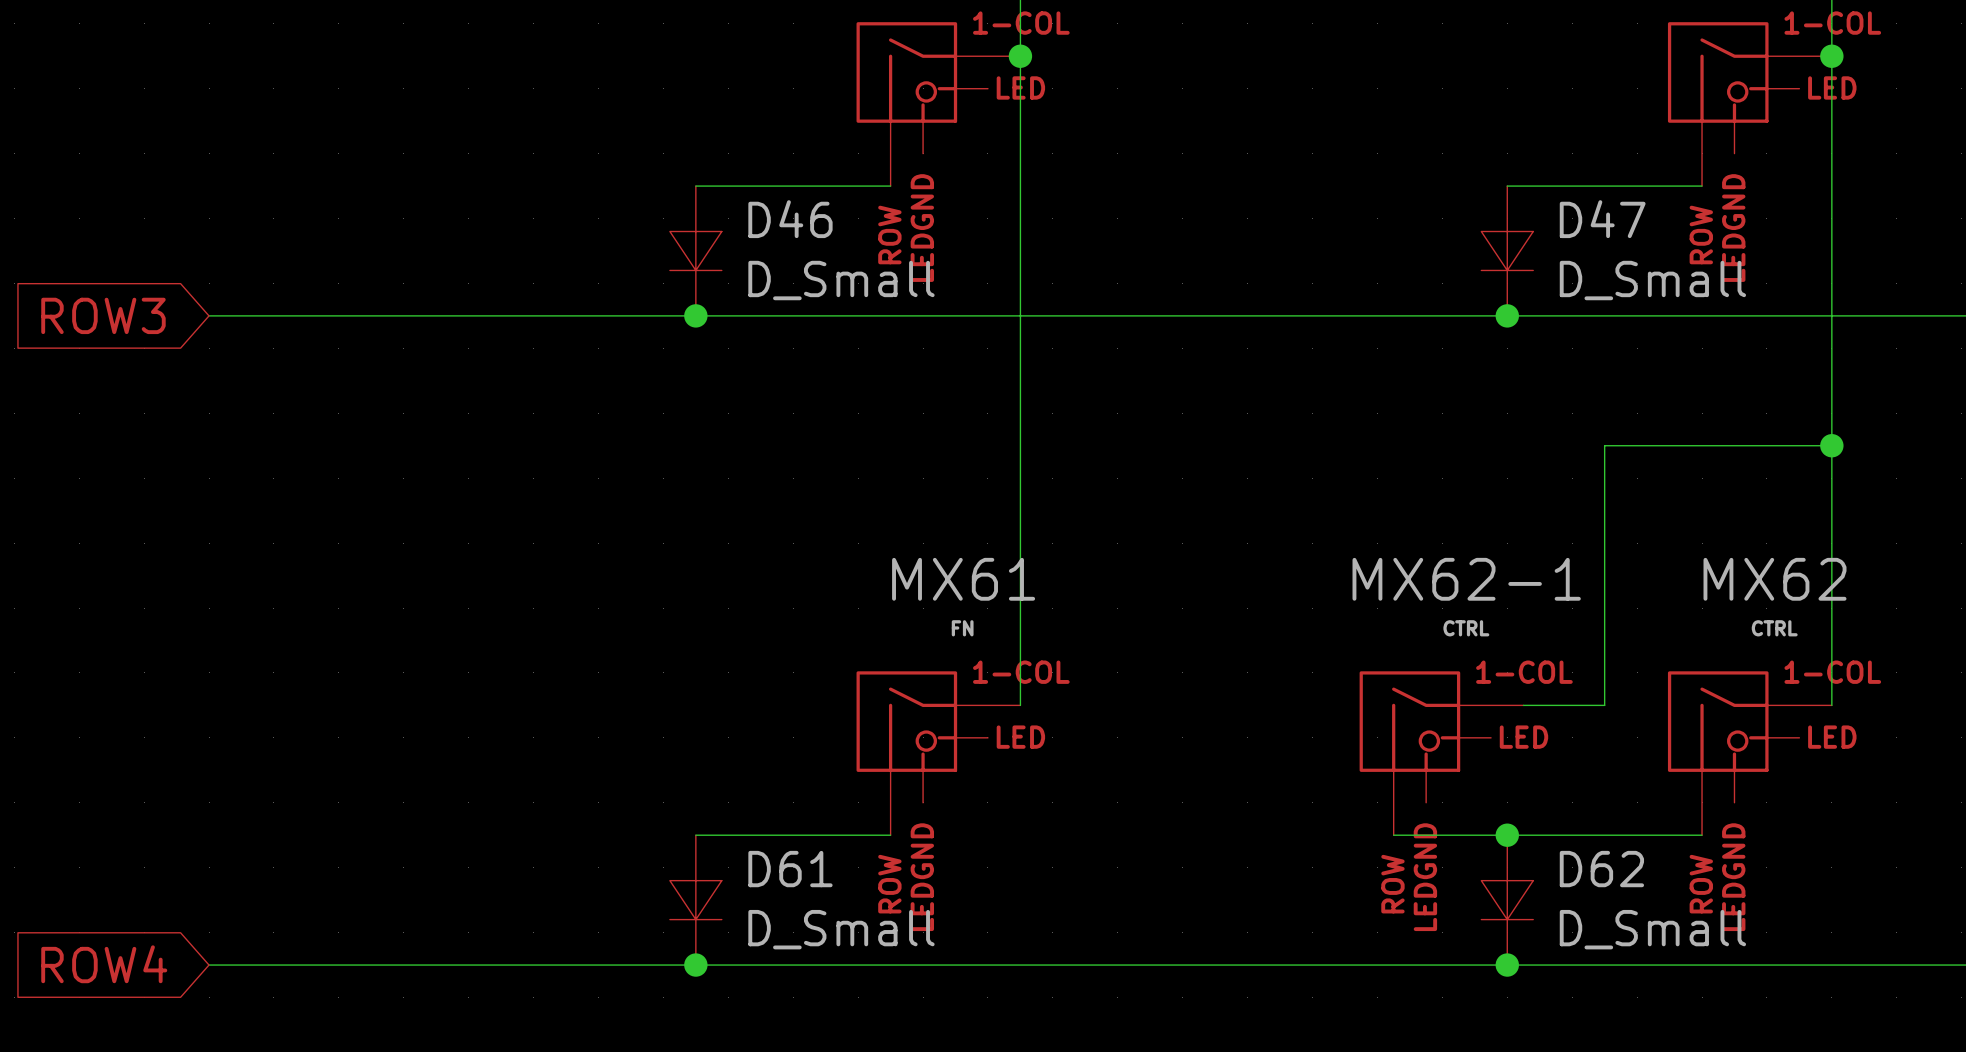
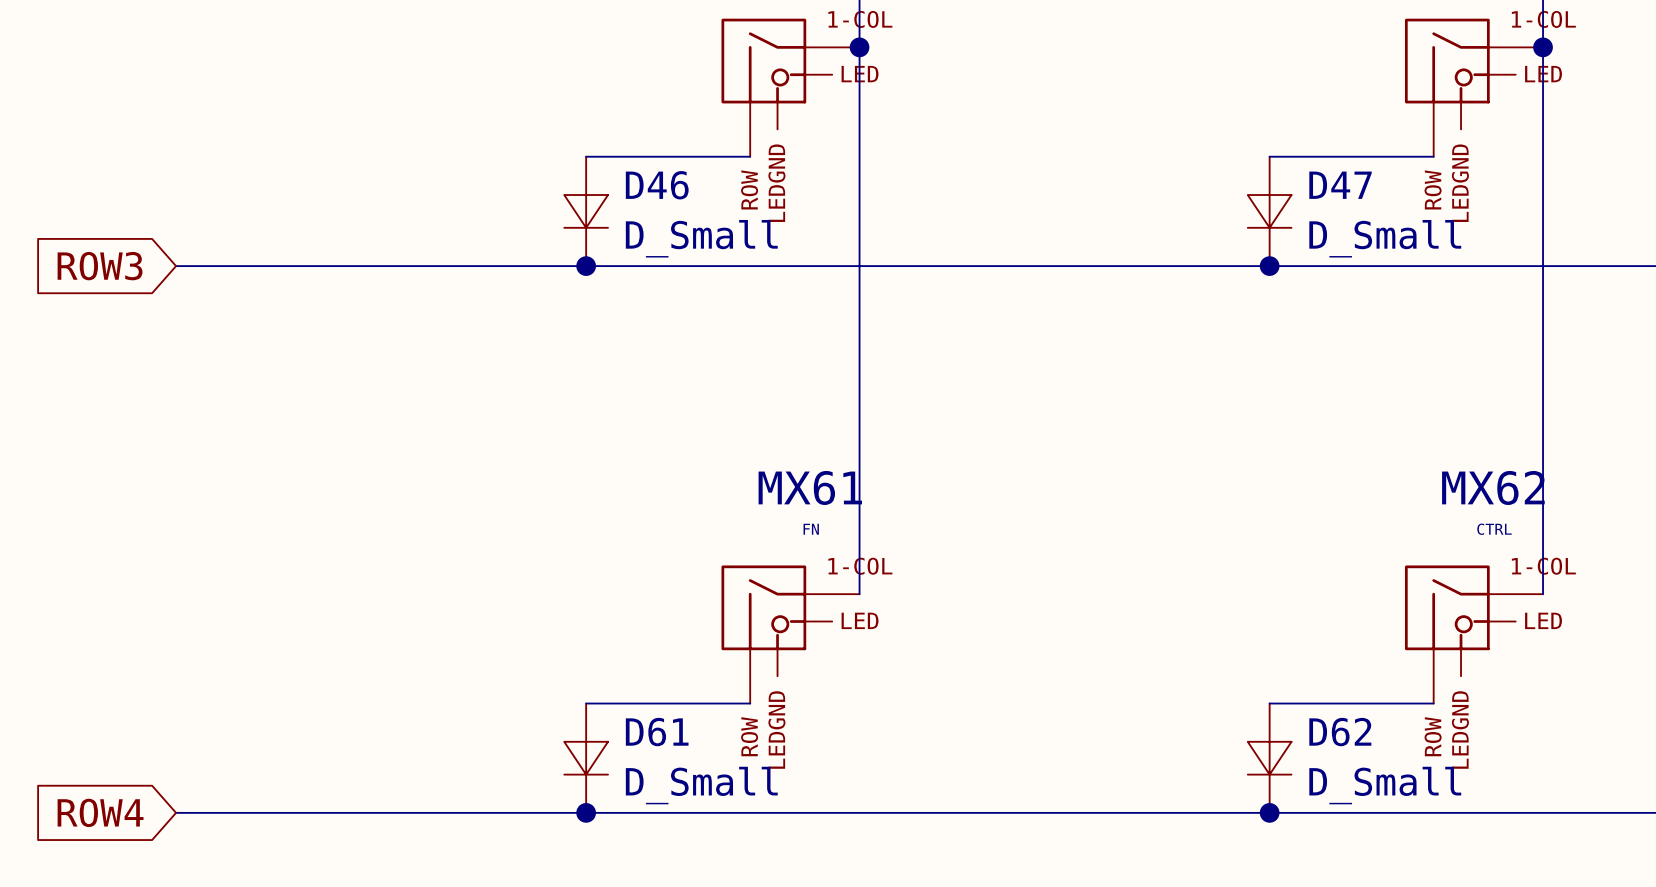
wire: (1831, 445) (1604, 445) (1604, 705) (1523, 705) -> none
junction: (1831, 445) -> none
MX62-1: CTRL (1441, 753) -> none
wire: (1393, 835) (1507, 835) -> none
junction: (1507, 835) -> none

